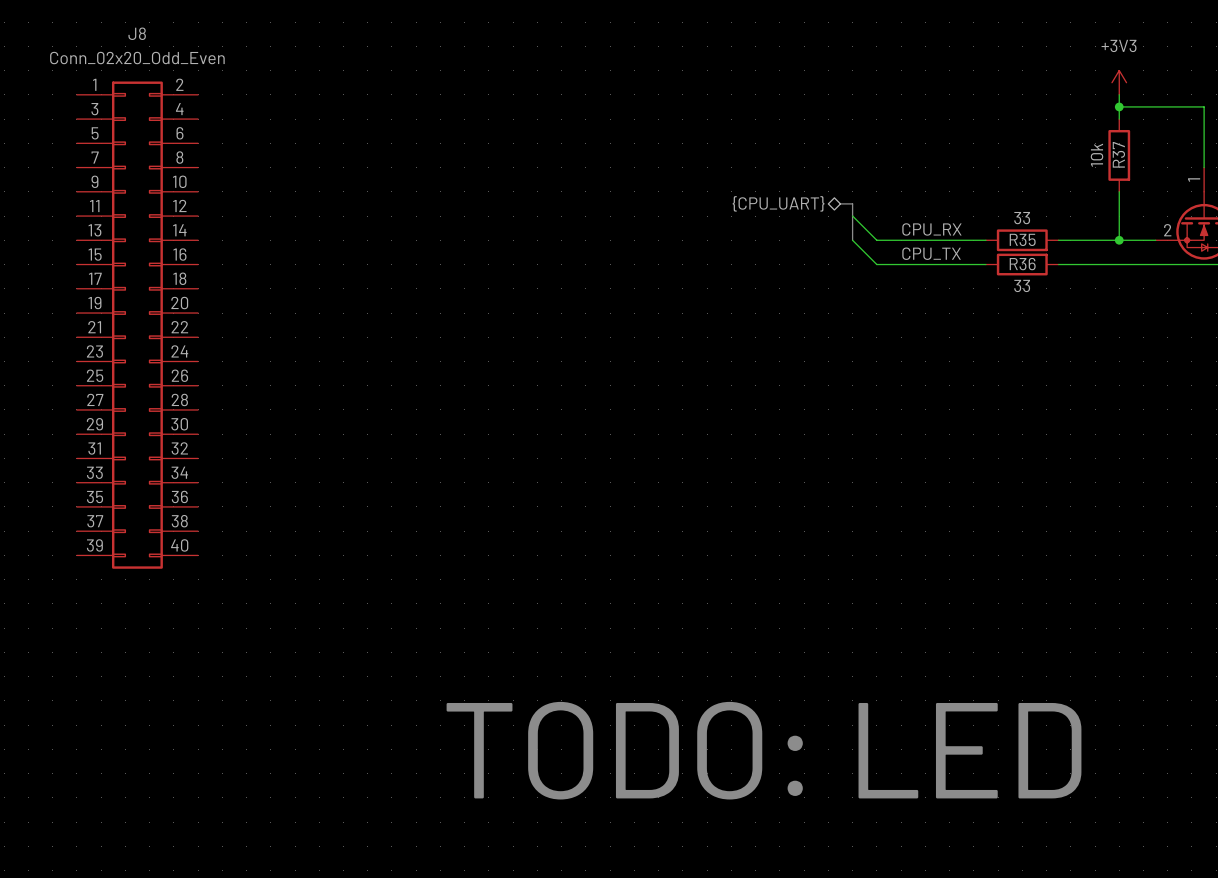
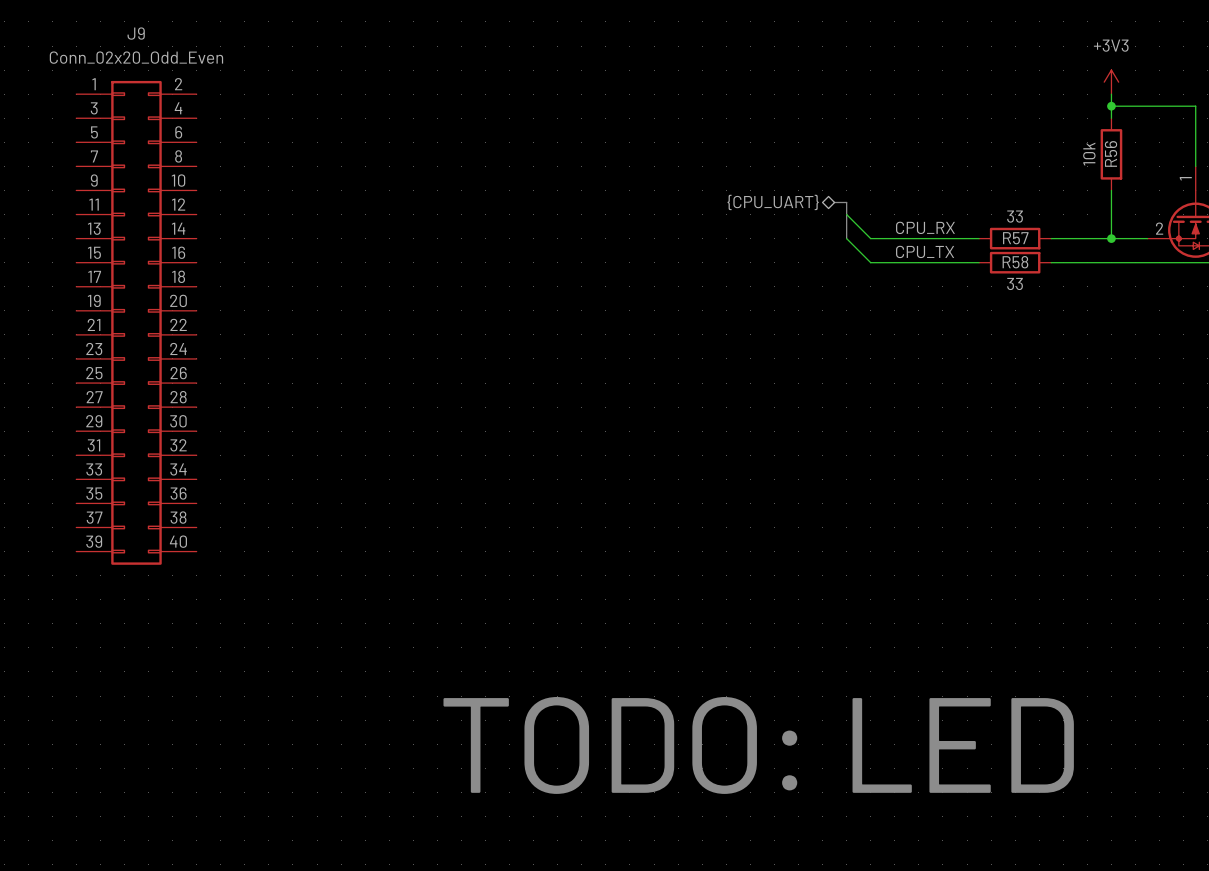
J8 name: J8 (137, 33) -> J9 (136, 33)
R37 name: R37 (1118, 154) -> R56 (1110, 153)
R35 name: R35 (1022, 239) -> R57 (1015, 238)
R36 name: R36 (1022, 264) -> R58 (1015, 262)

